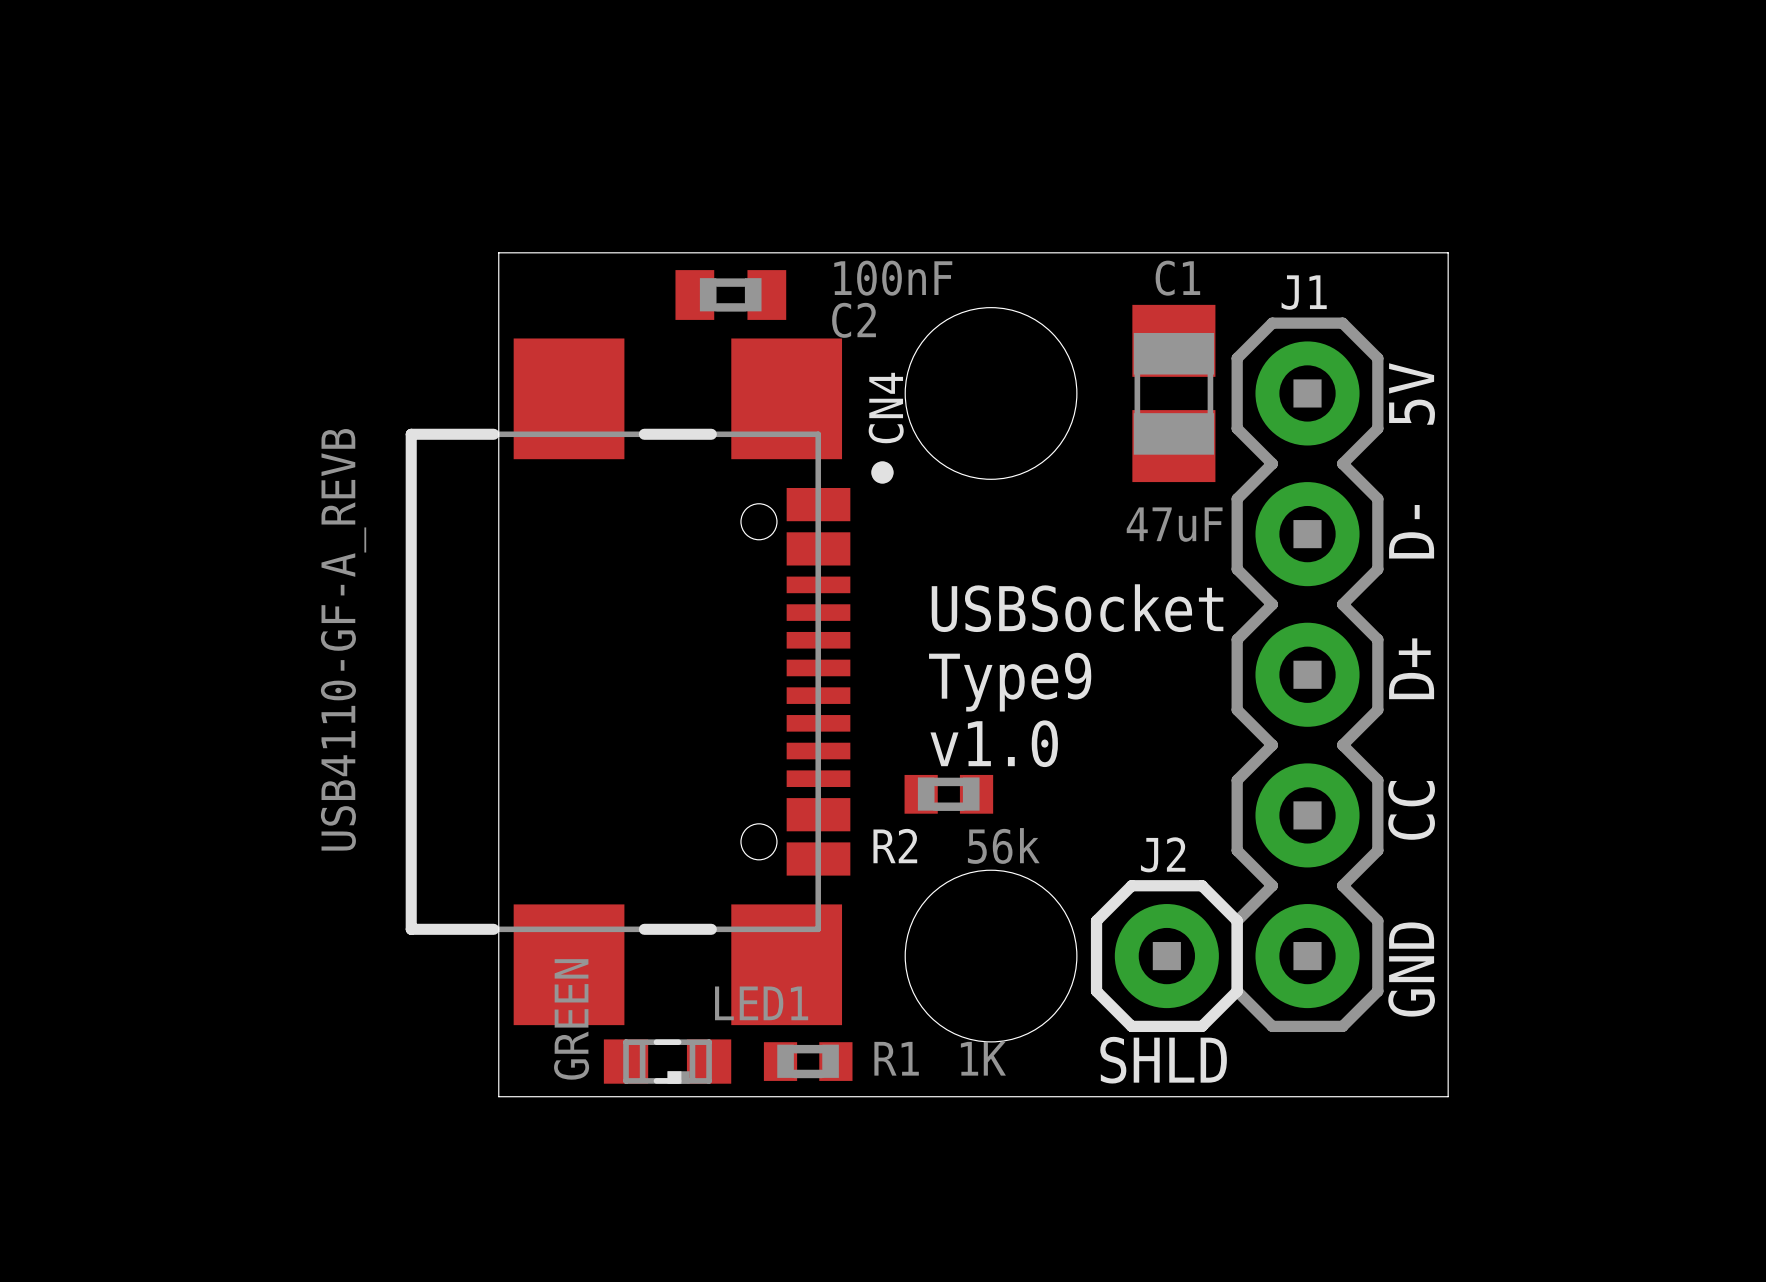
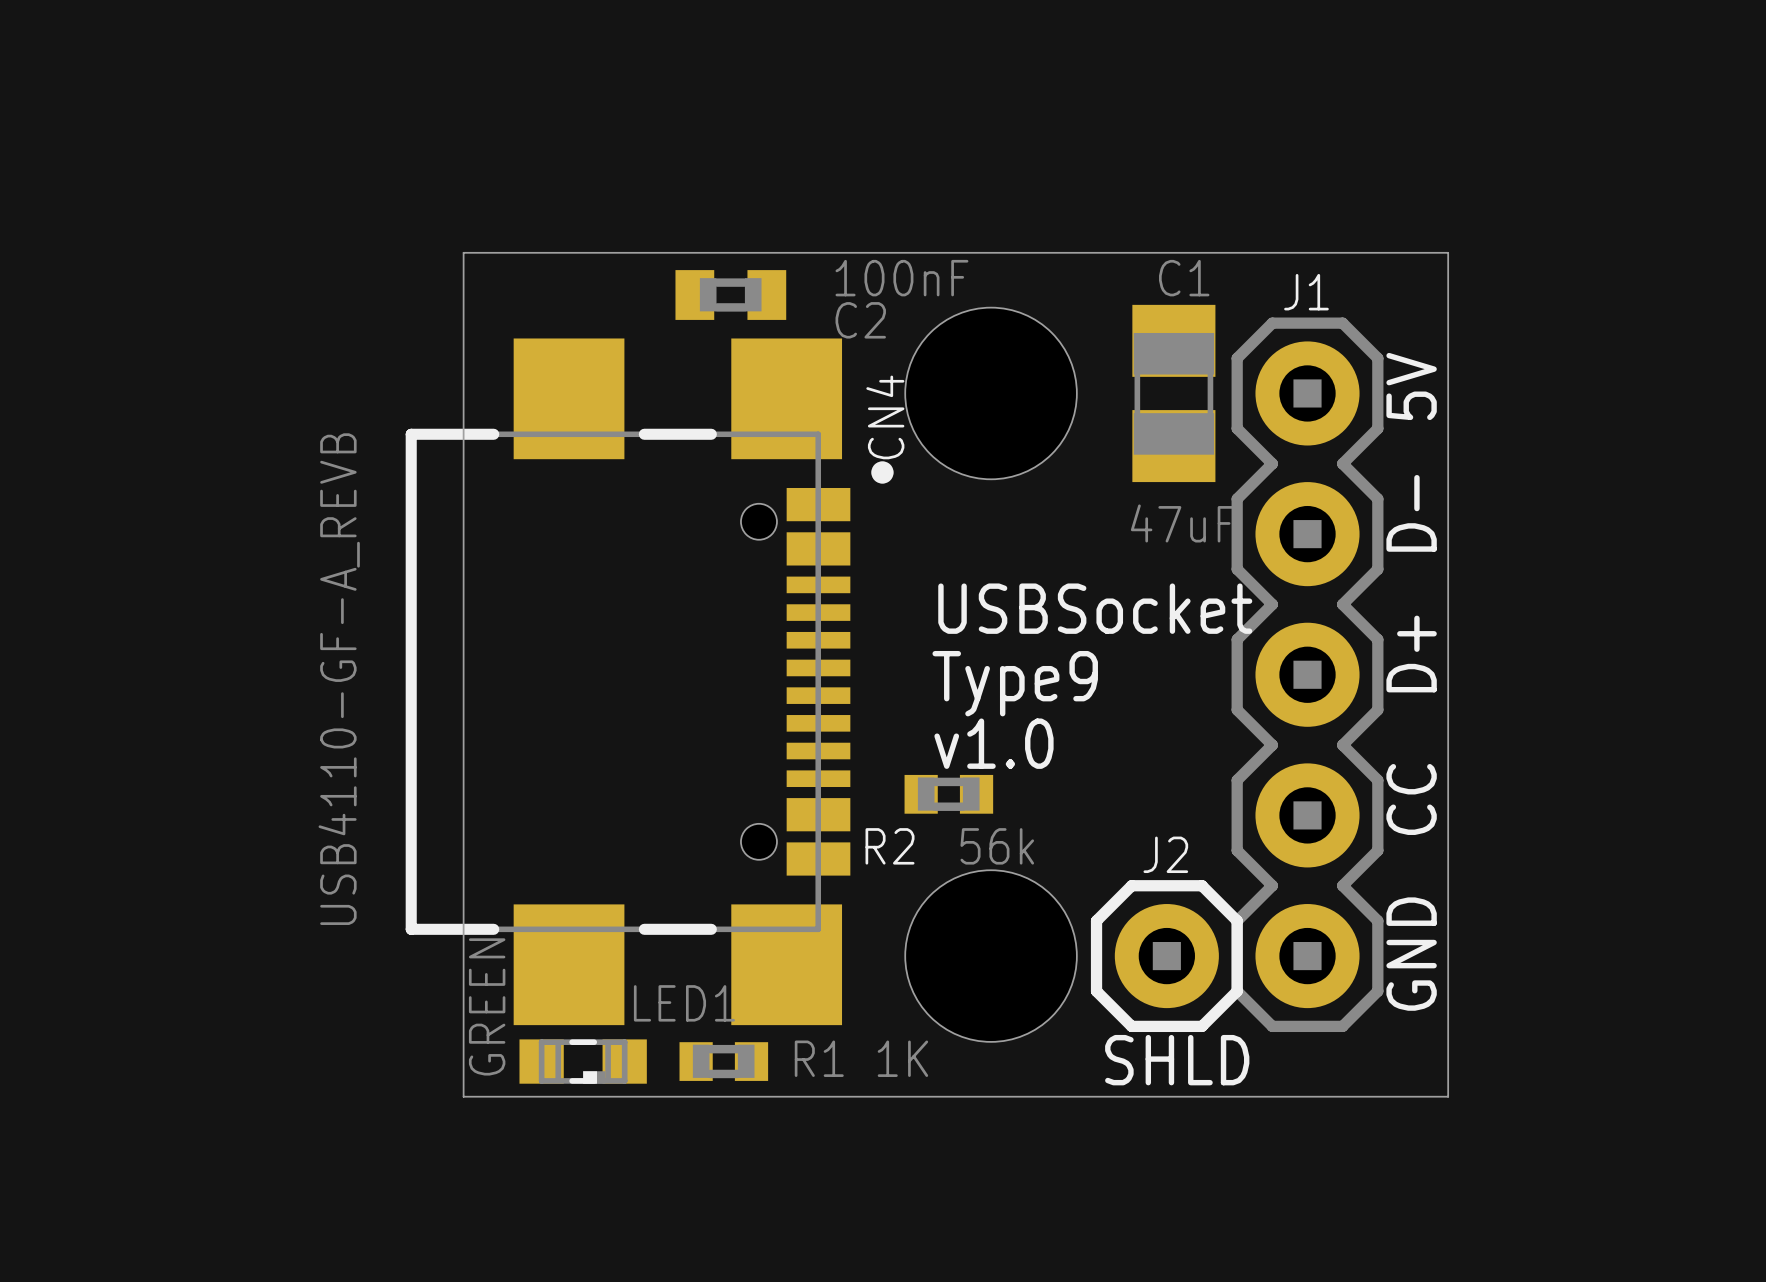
board edge: (498, 252) (498, 1096) -> (498, 252) (463, 252) (463, 1096) (498, 1096)
LED1 position: (667, 1061) -> (583, 1061)
R1 position: (808, 1061) -> (723, 1061)

